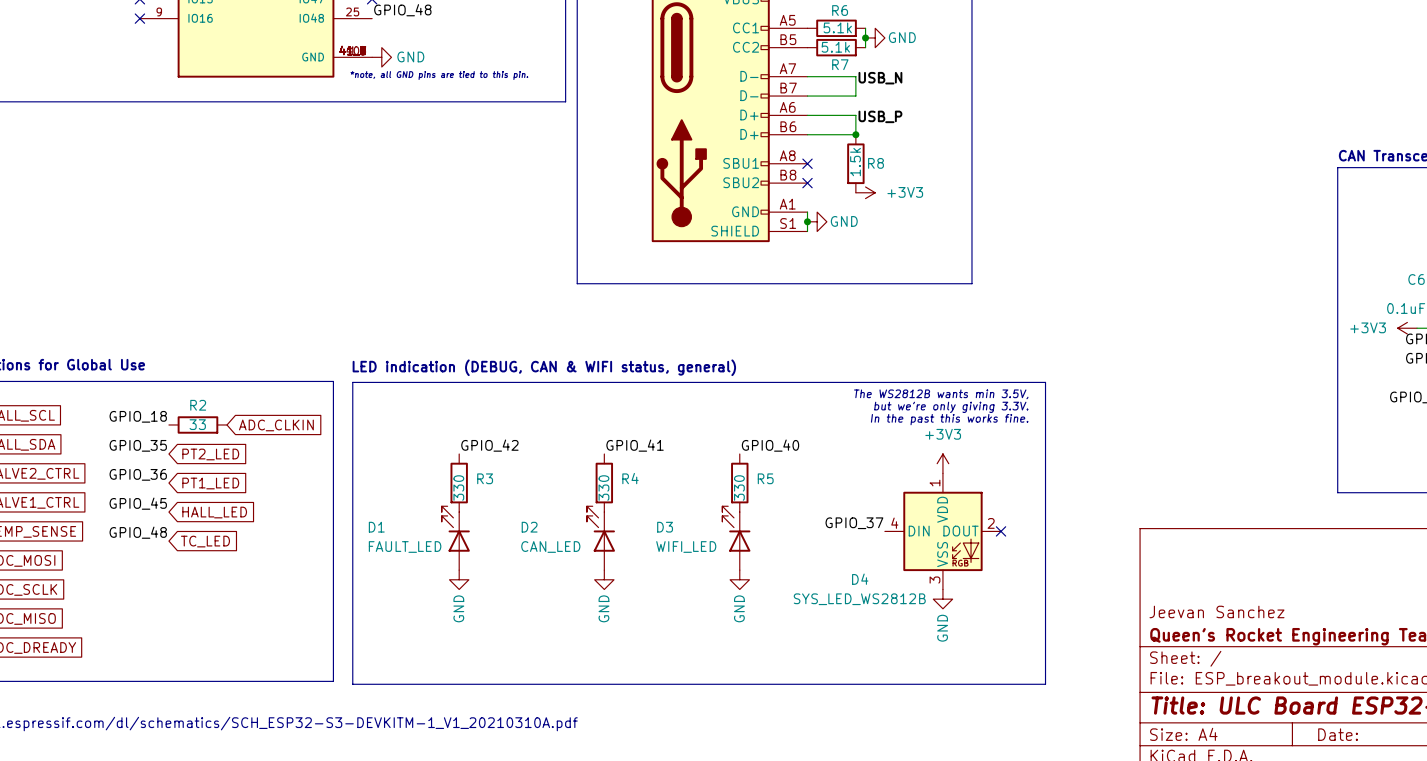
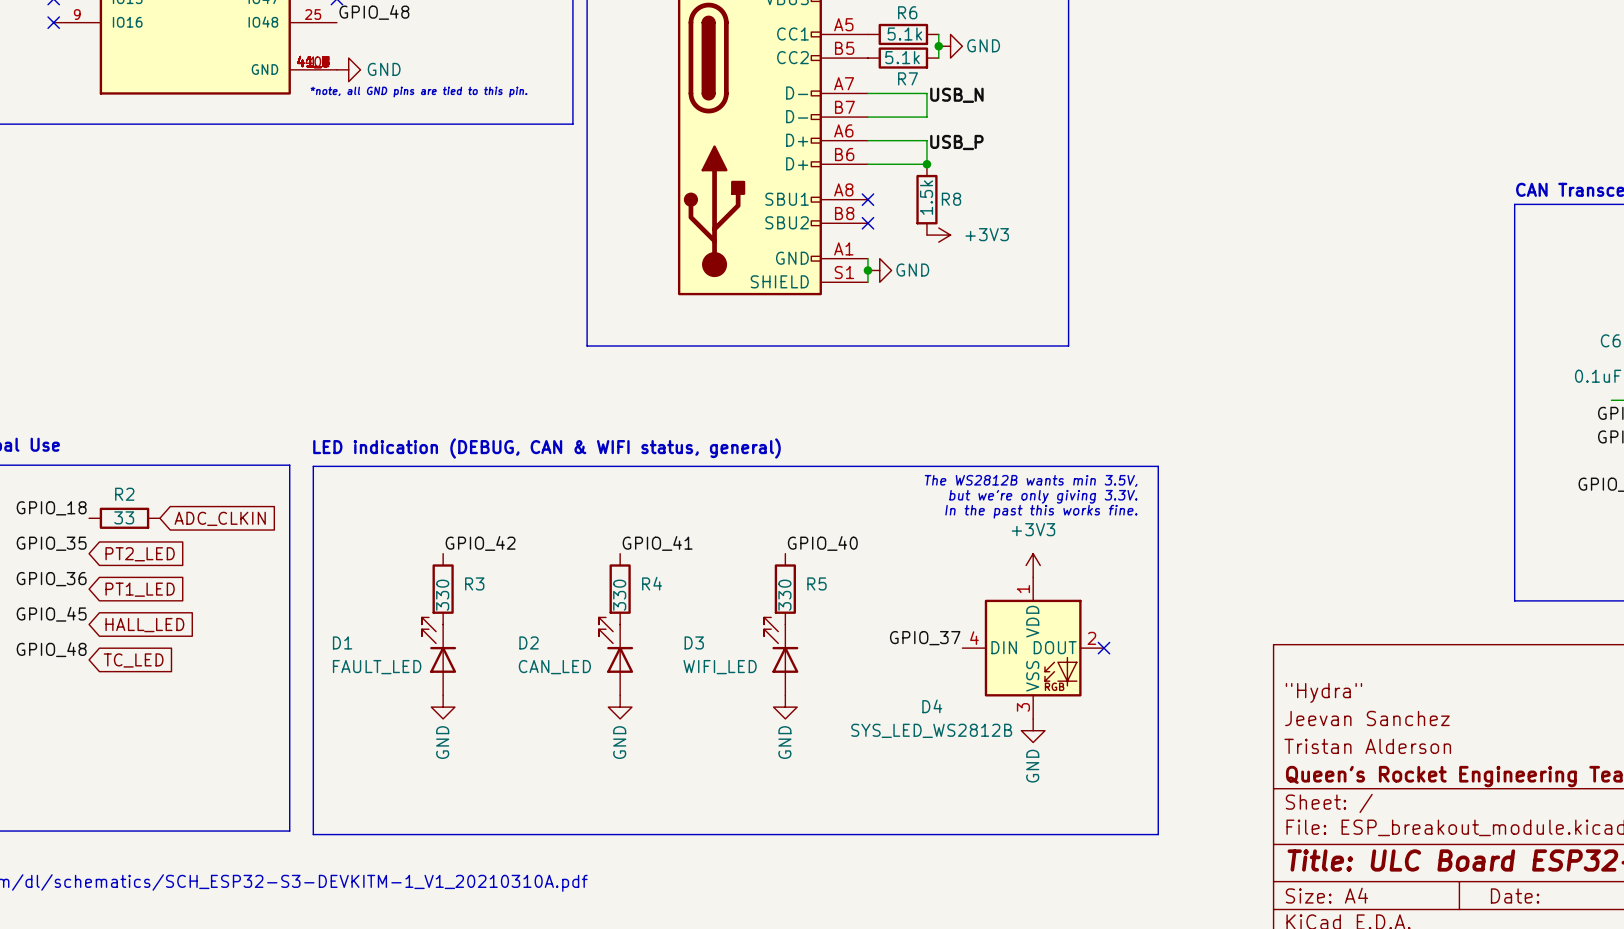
power symbol: +3V3 (1407, 328) -> none
title block: none -> "Hydra" (1323, 692)
title block: none -> Jeevan Sanchez (1367, 718)
title block: Jeevan Sanchez (1216, 611) -> Tristan Alderson (1367, 746)

